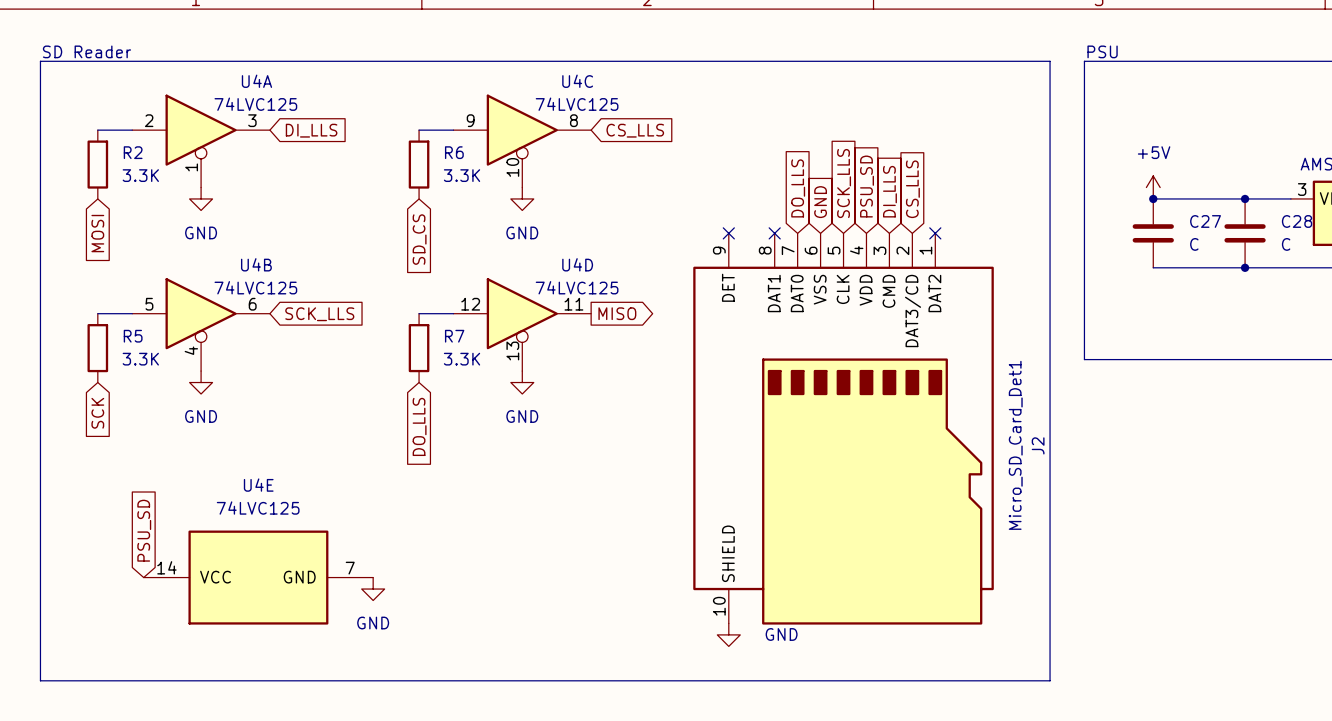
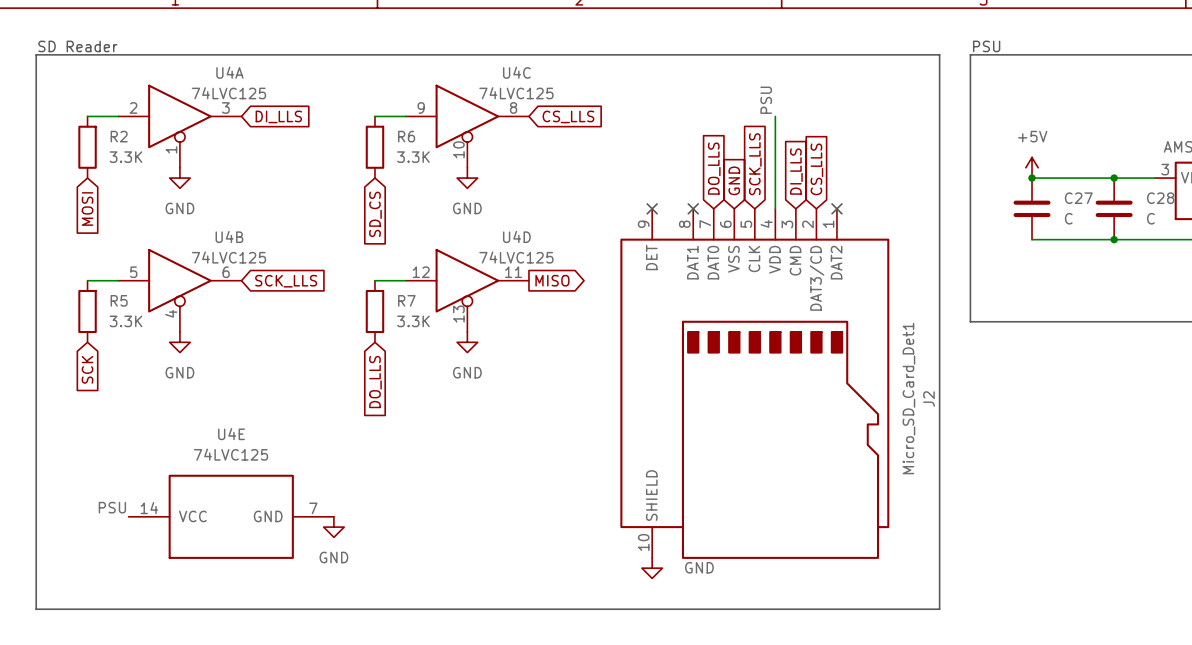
label: none -> PSU (766, 100)
wire: none -> (775, 116) (775, 208)
global label: PSU_SD (867, 186) -> none
global label: PSU_SD (144, 530) -> none
label: none -> PSU (112, 507)

